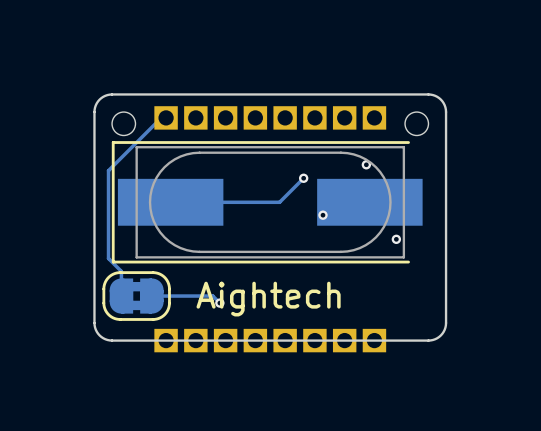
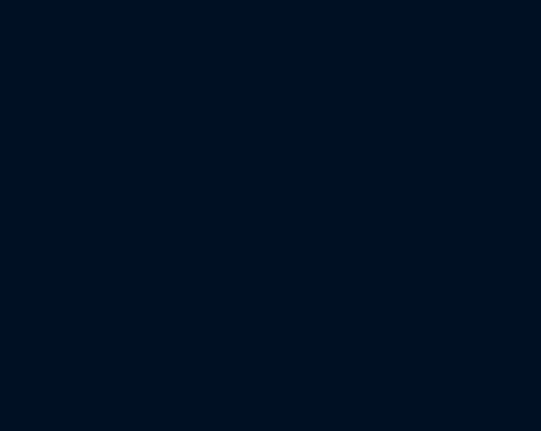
board edge: (428, 94) (112, 94) (101, 98) (96, 103) (94, 112) (94, 323) (98, 333) (105, 339) (112, 340) (428, 340) (439, 336) (444, 329) (446, 323) (446, 112) (440, 99) (428, 94) -> none
round board edge: [111, 111, 136, 136] -> none
round board edge: [404, 111, 429, 136] -> none
track: (166, 117) (161, 117) (108, 170) (108, 258) (121, 271) (121, 296) -> none
part: (166, 117) -> none
part: (195, 117) -> none
part: (225, 117) -> none
part: (255, 117) -> none
part: (285, 117) -> none
part: (314, 117) -> none
part: (344, 117) -> none
part: (374, 117) -> none
via: (366, 164) -> none
track: (303, 178) (279, 202) (170, 202) -> none
via: (303, 178) -> none
part: (267, 202) -> none
via: (323, 215) -> none
via: (396, 239) -> none
part: (136, 296) -> none
track: (151, 296) (212, 296) (219, 303) -> none
text: Aightech (268, 299) -> none
via: (219, 303) -> none
part: (166, 340) -> none
part: (195, 340) -> none
part: (225, 340) -> none
part: (255, 340) -> none
part: (285, 340) -> none
part: (314, 340) -> none
part: (344, 340) -> none
part: (374, 340) -> none

